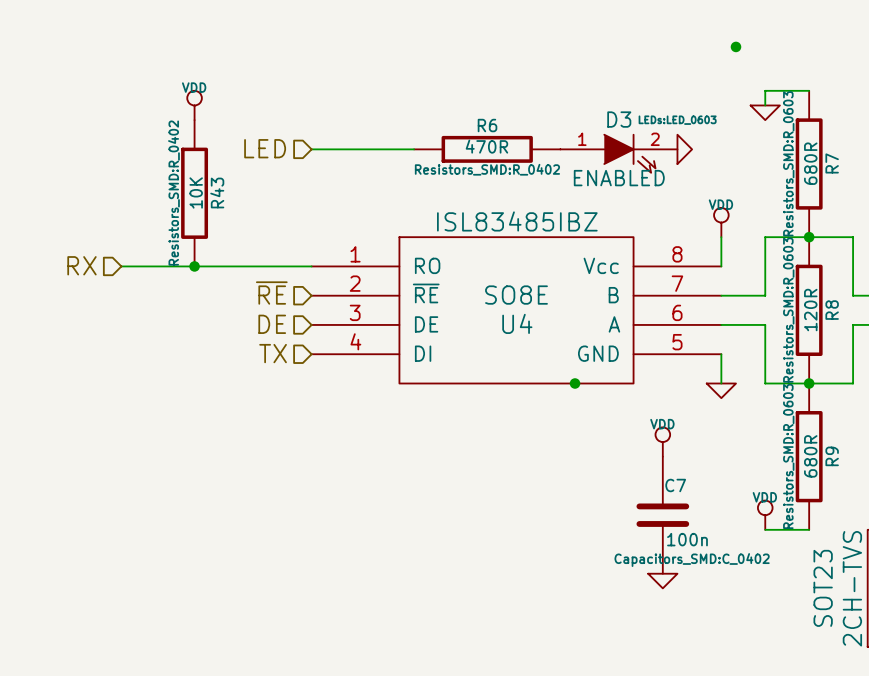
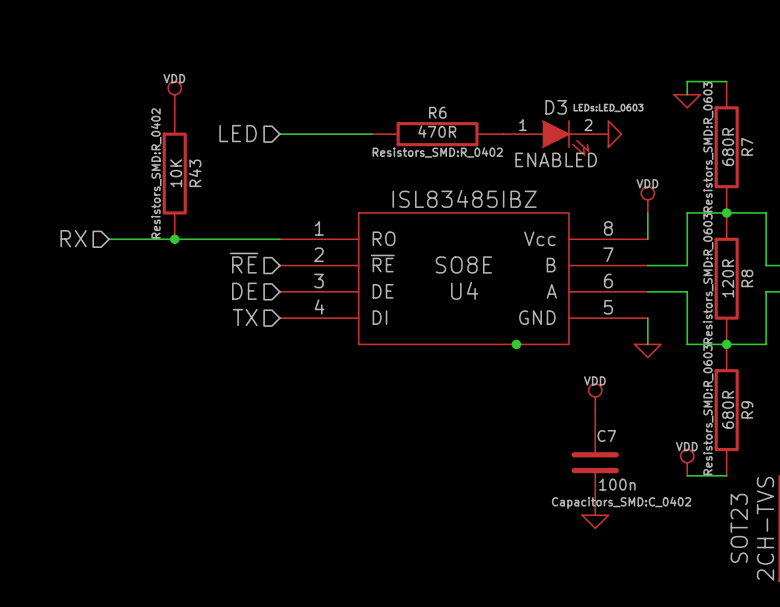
junction: (735, 46) -> none

